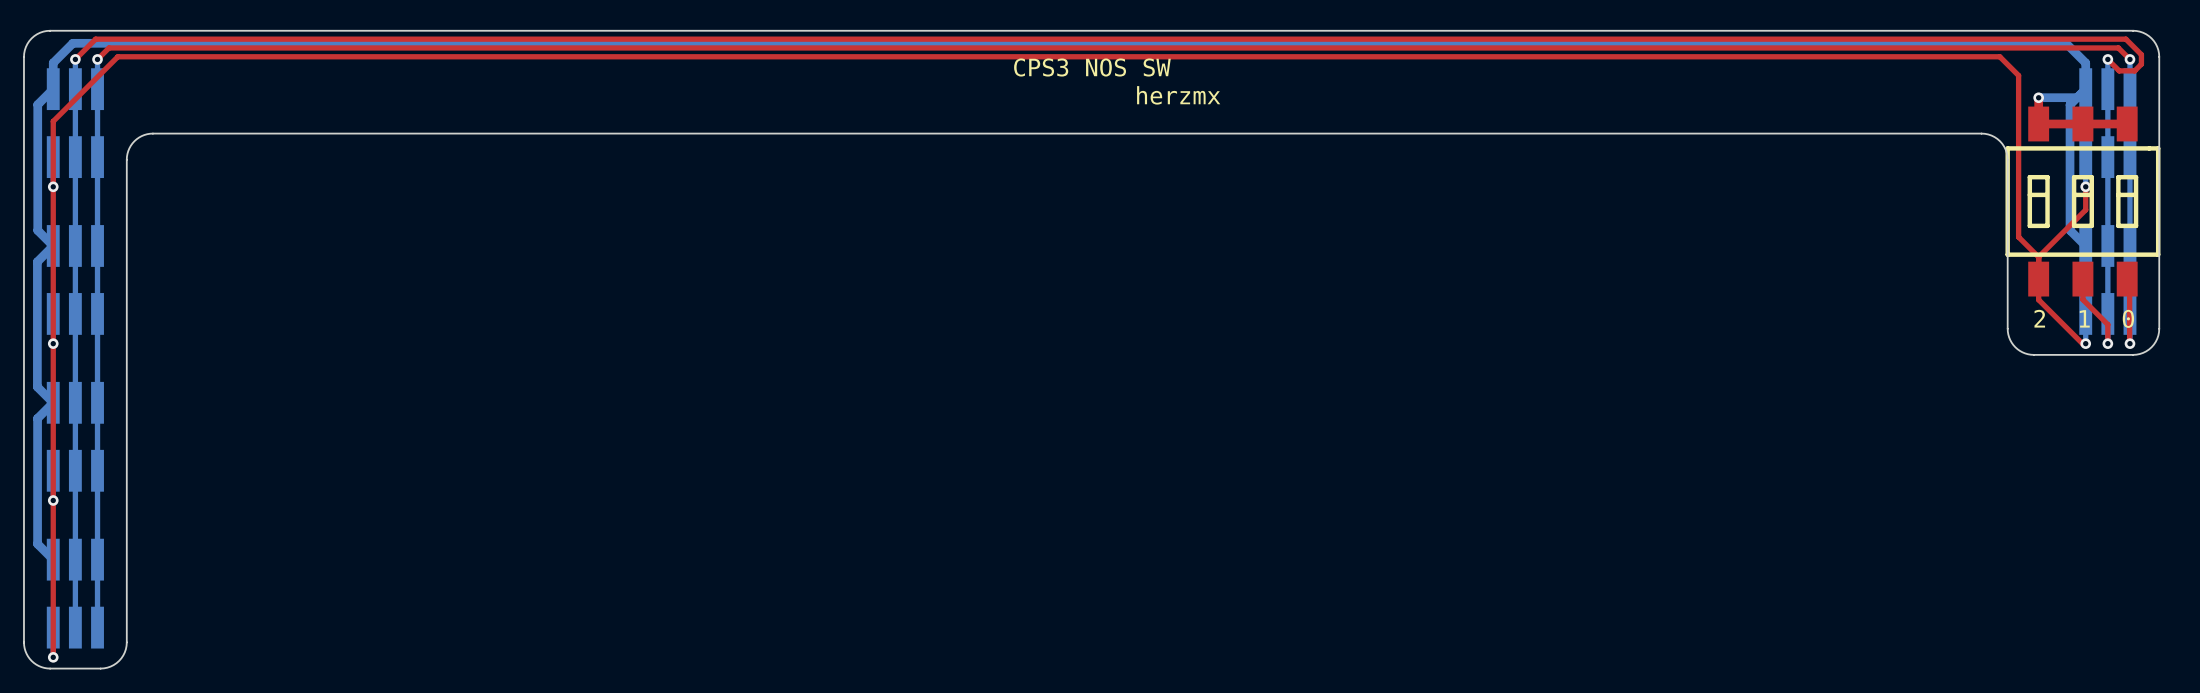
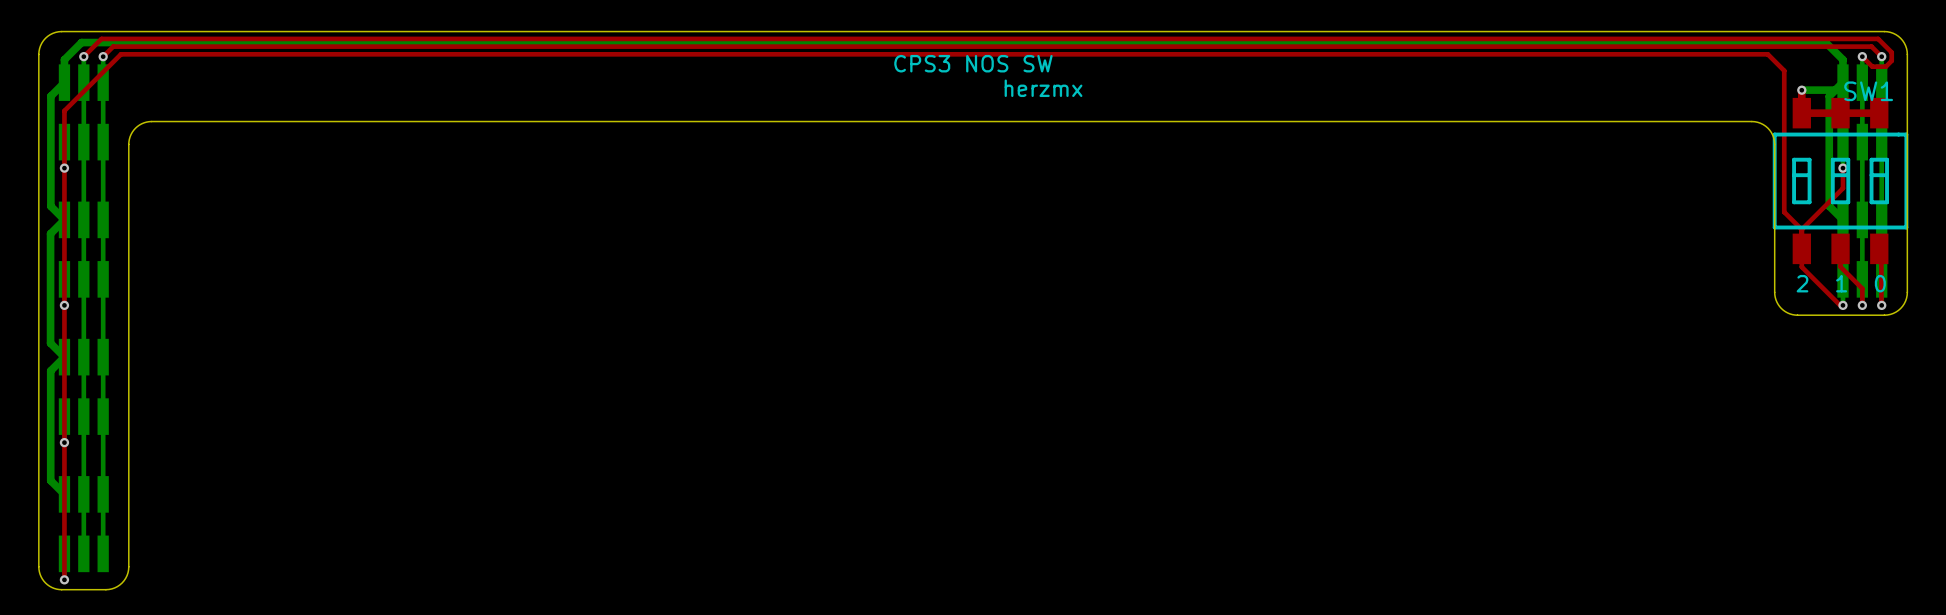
SW1 name: none -> SW1 (1868, 91)

